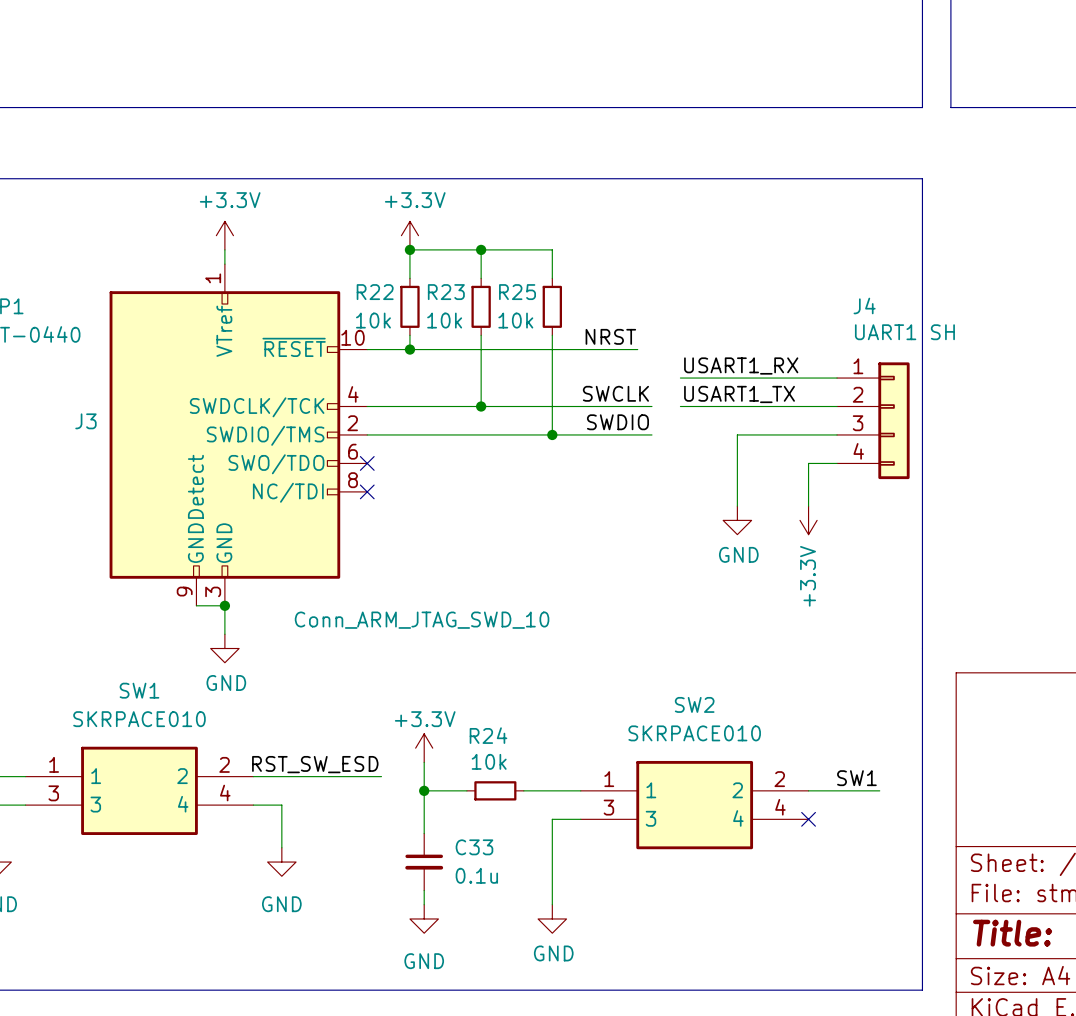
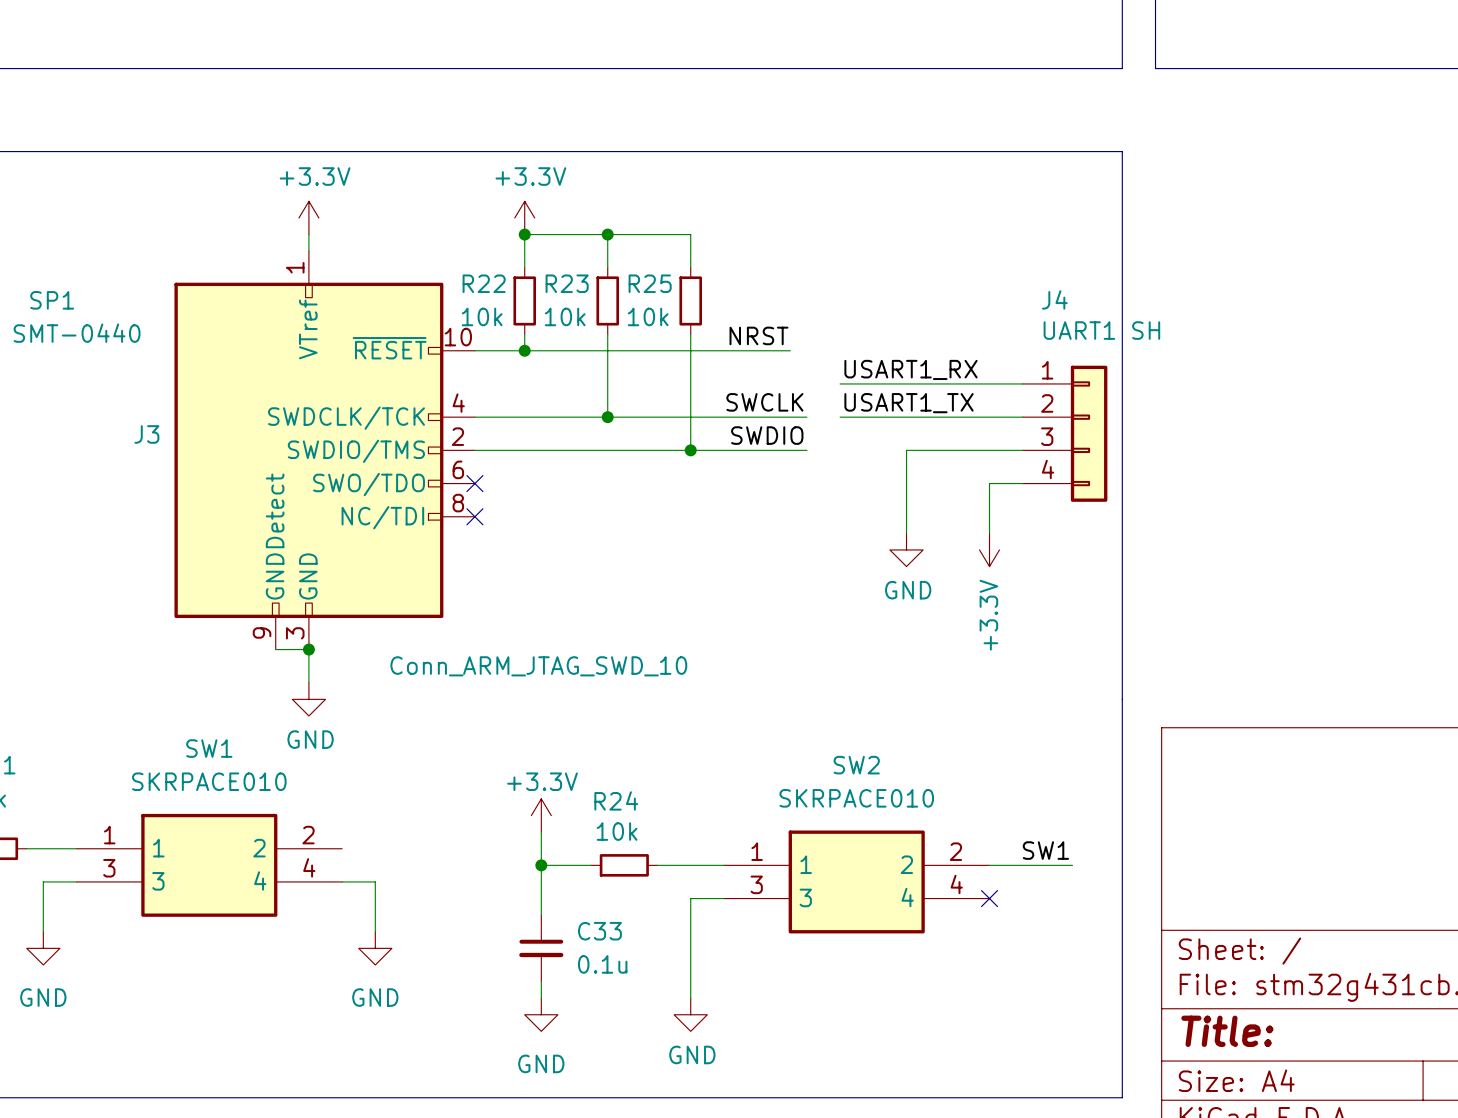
label: RST_SW_ESD (315, 764) -> none
wire: (253, 776) (381, 776) -> none

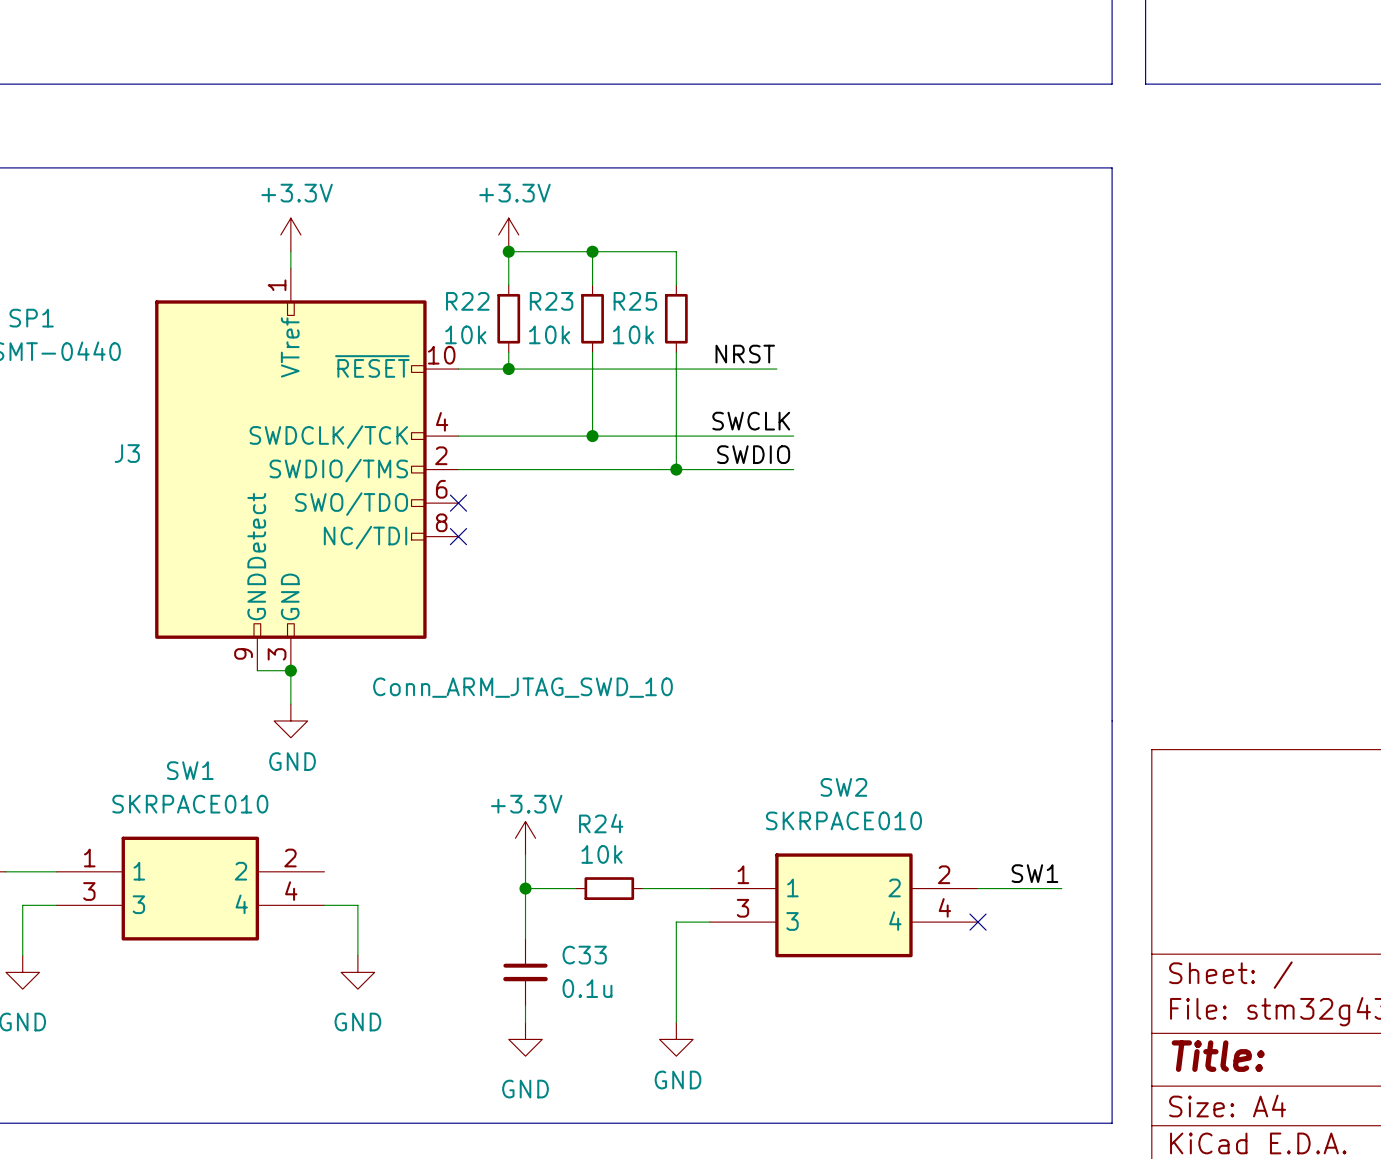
label: USART1_RX (910, 369) -> none
wire: (840, 383) (1022, 383) -> none
label: USART1_TX (909, 403) -> none
wire: (840, 417) (1022, 417) -> none
J4: UART1 SH (1065, 433) -> none
wire: (1022, 450) (906, 450) (906, 533) -> none
wire: (1022, 483) (989, 483) (989, 533) -> none
power symbol: GND (906, 549) -> none
power symbol: +3.3V (989, 549) -> none

